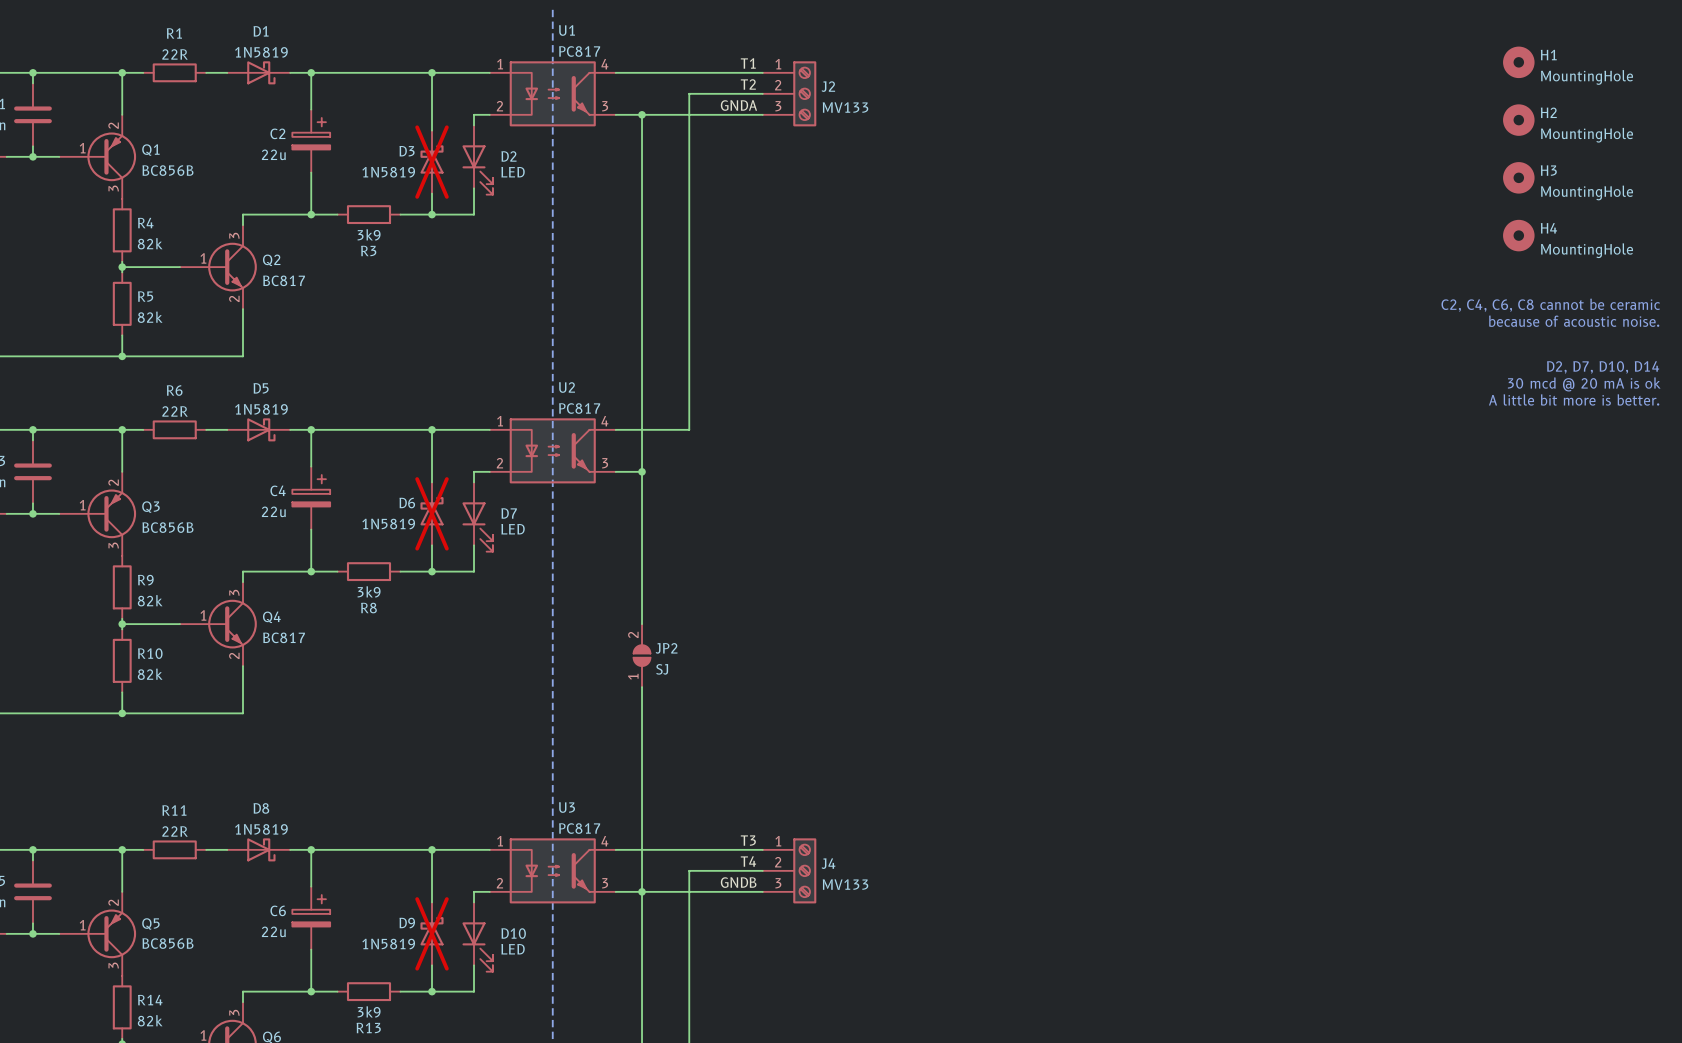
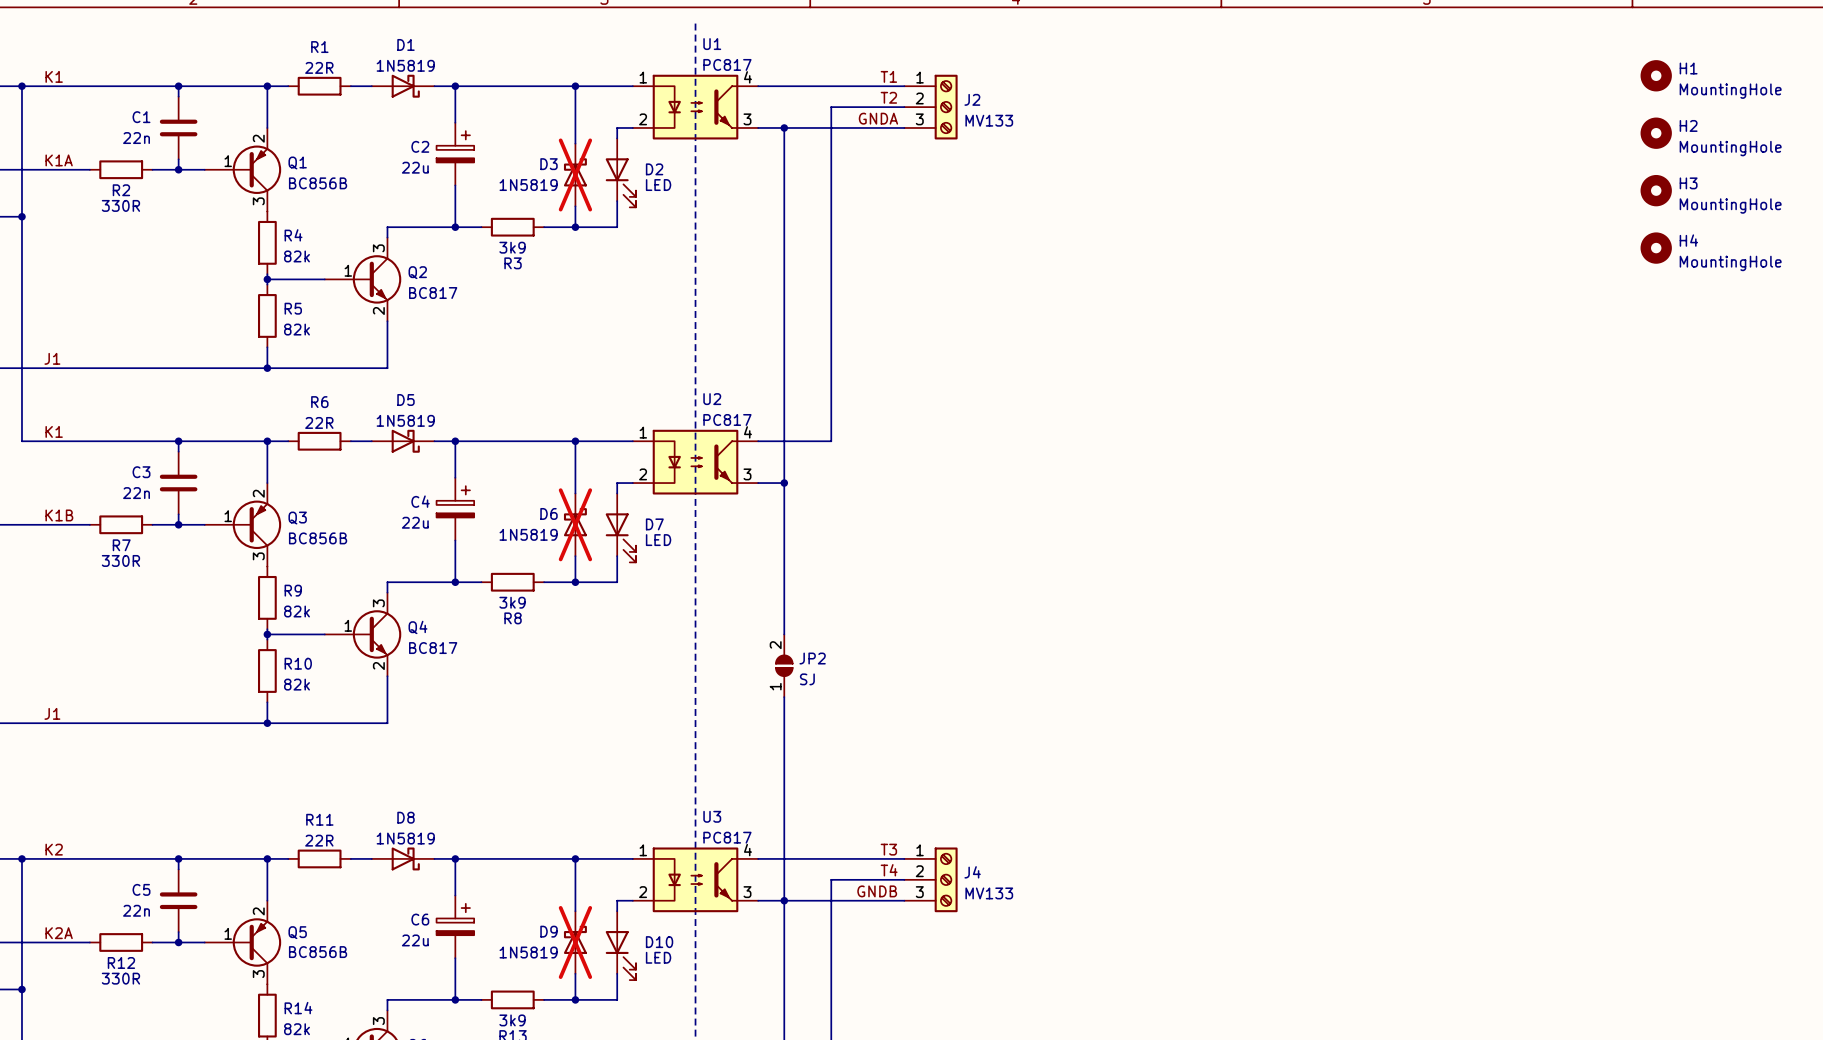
text: C2, C4, C6, C8 cannot be ceramic (1550, 305) -> none
text: because of acoustic noise. (1574, 321) -> none
text: D2, D7, D10, D14 (1603, 367) -> none
text: 30 mcd @ 20 mA is ok (1584, 384) -> none
text: A little bit more is better. (1574, 399) -> none

